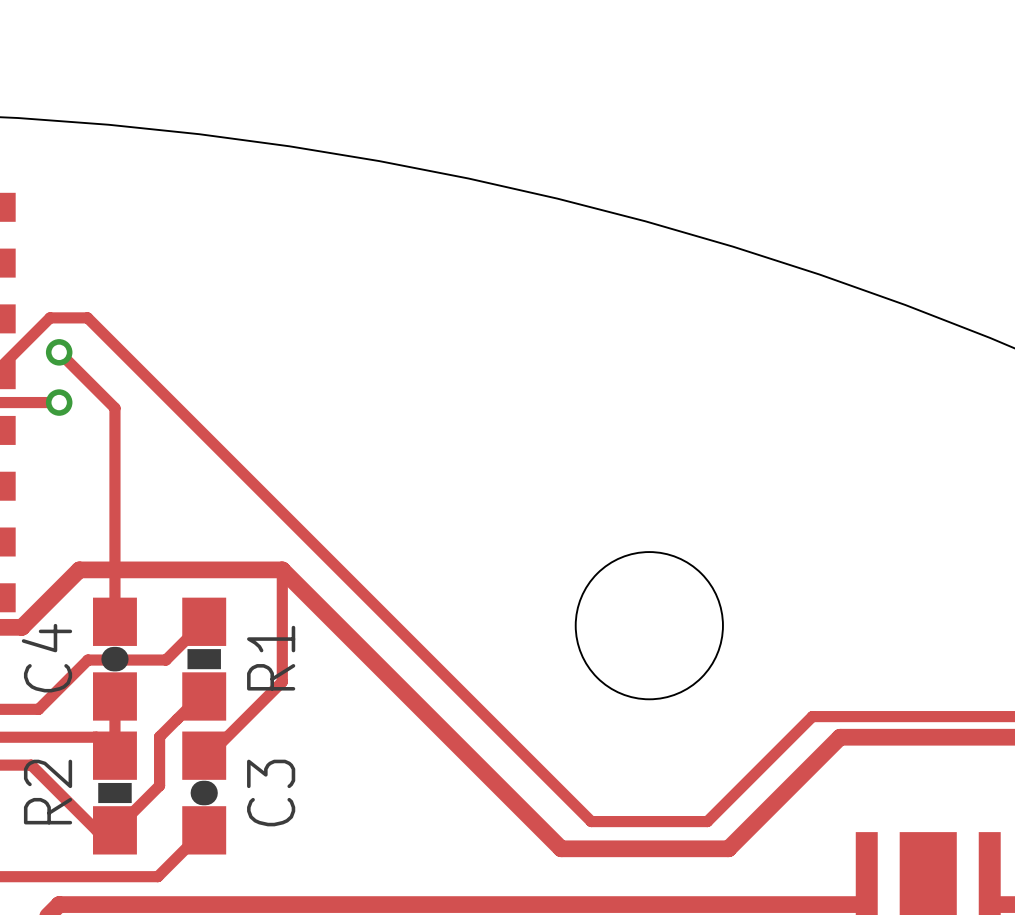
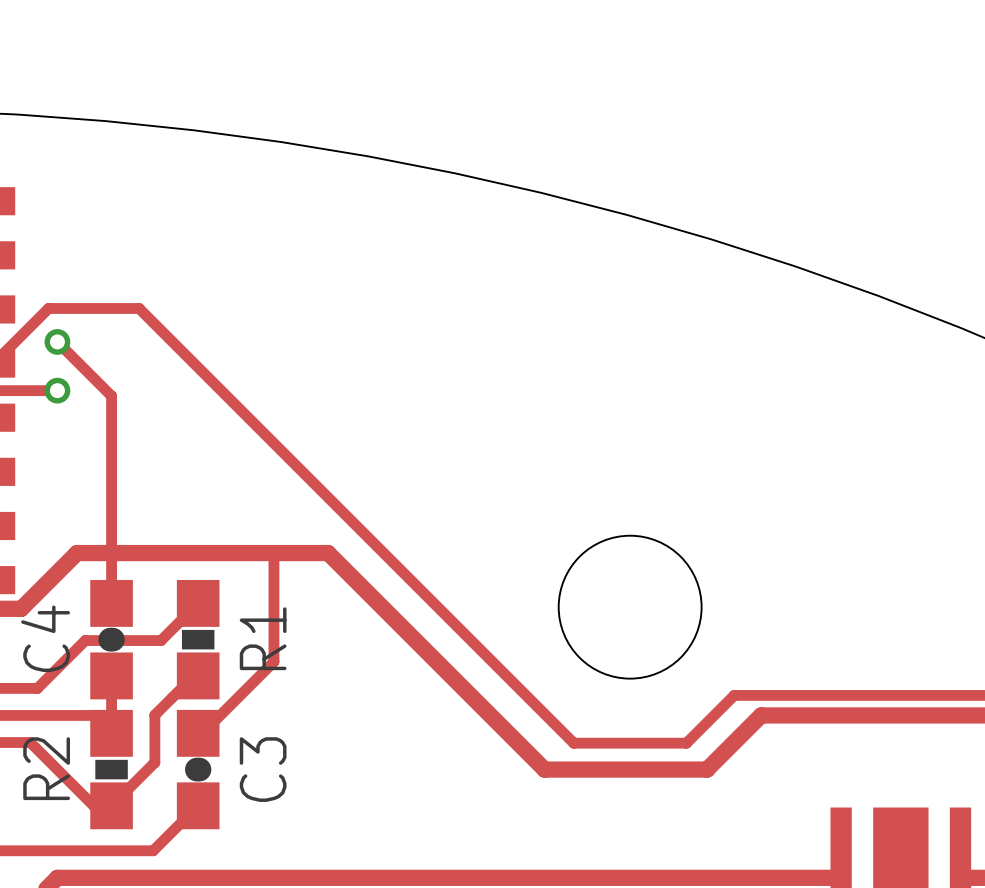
track: (87, 317) (591, 821) (707, 821) (812, 716) -> (85, 308) (139, 308) (573, 743) (686, 743) (734, 695) (788, 695)
track: (282, 569) (561, 848) (728, 848) (840, 737) -> (273, 553) (328, 553) (544, 769) (707, 769) (761, 715) (815, 715)

